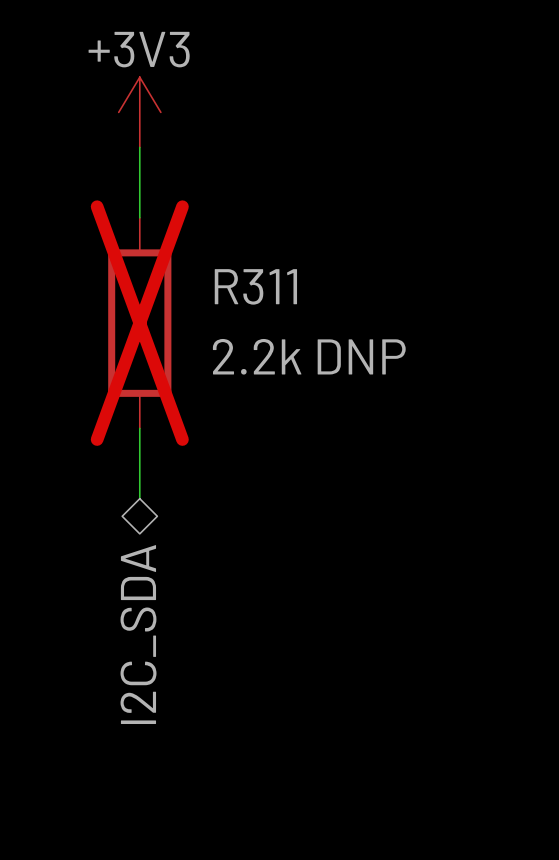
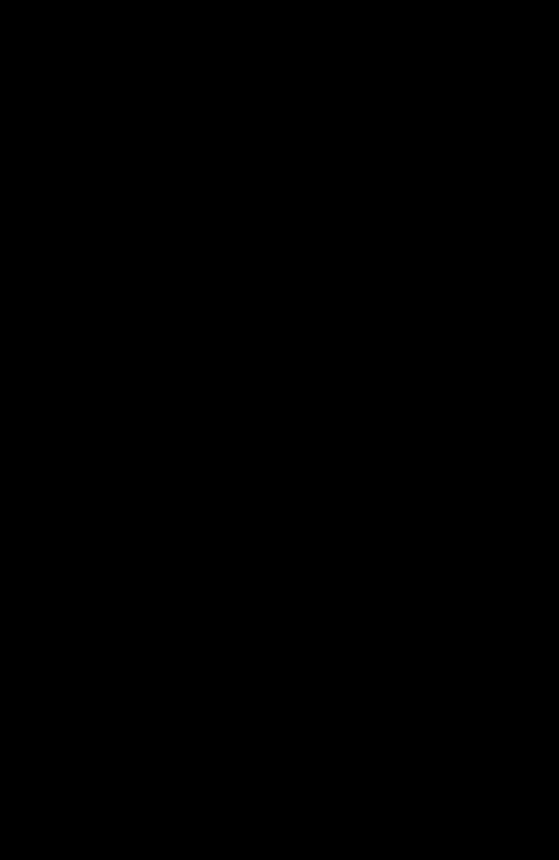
power symbol: +3V3 (139, 112) -> none
wire: (139, 147) (139, 217) -> none
R311: 2.2k DNP (139, 323) -> none
wire: (139, 428) (139, 498) -> none
hierarchical label: I2C_SDA (138, 634) -> none

